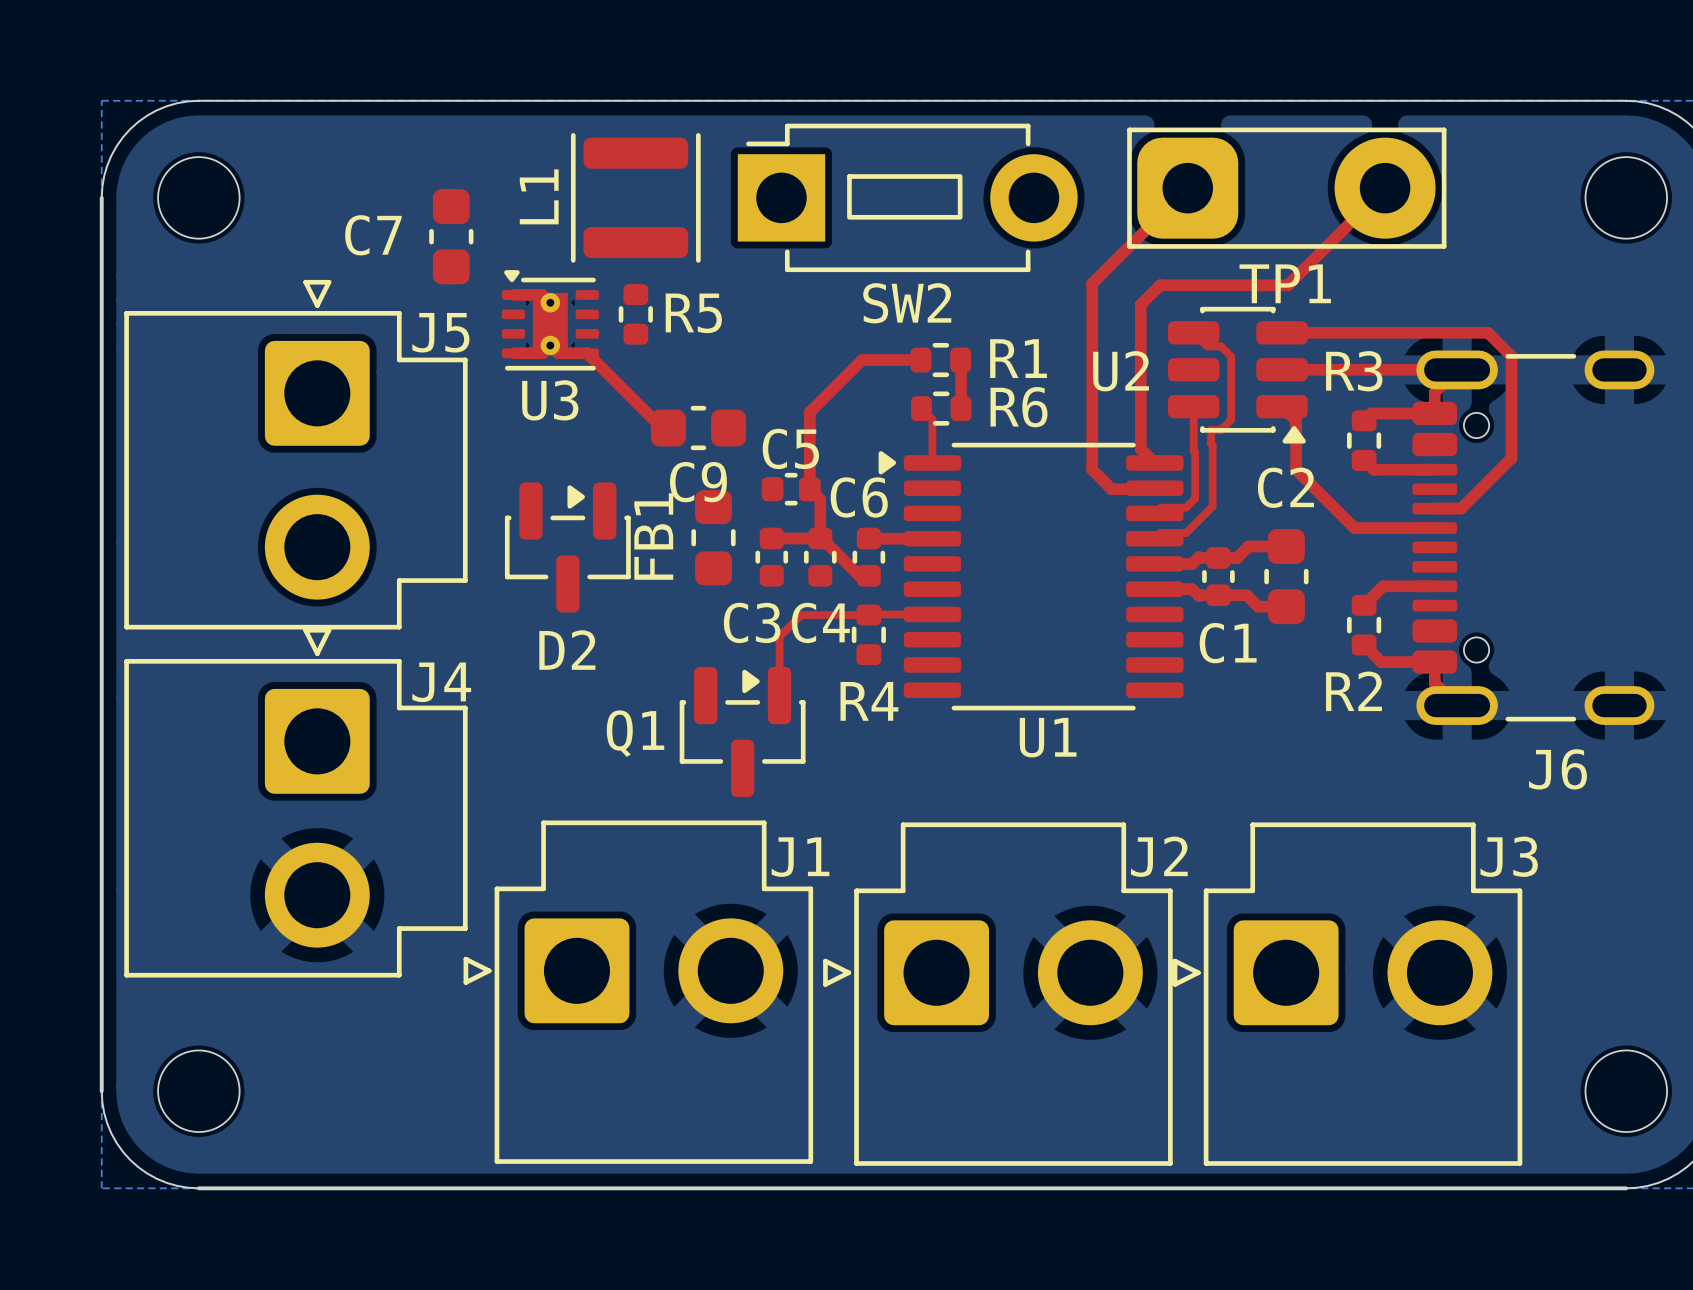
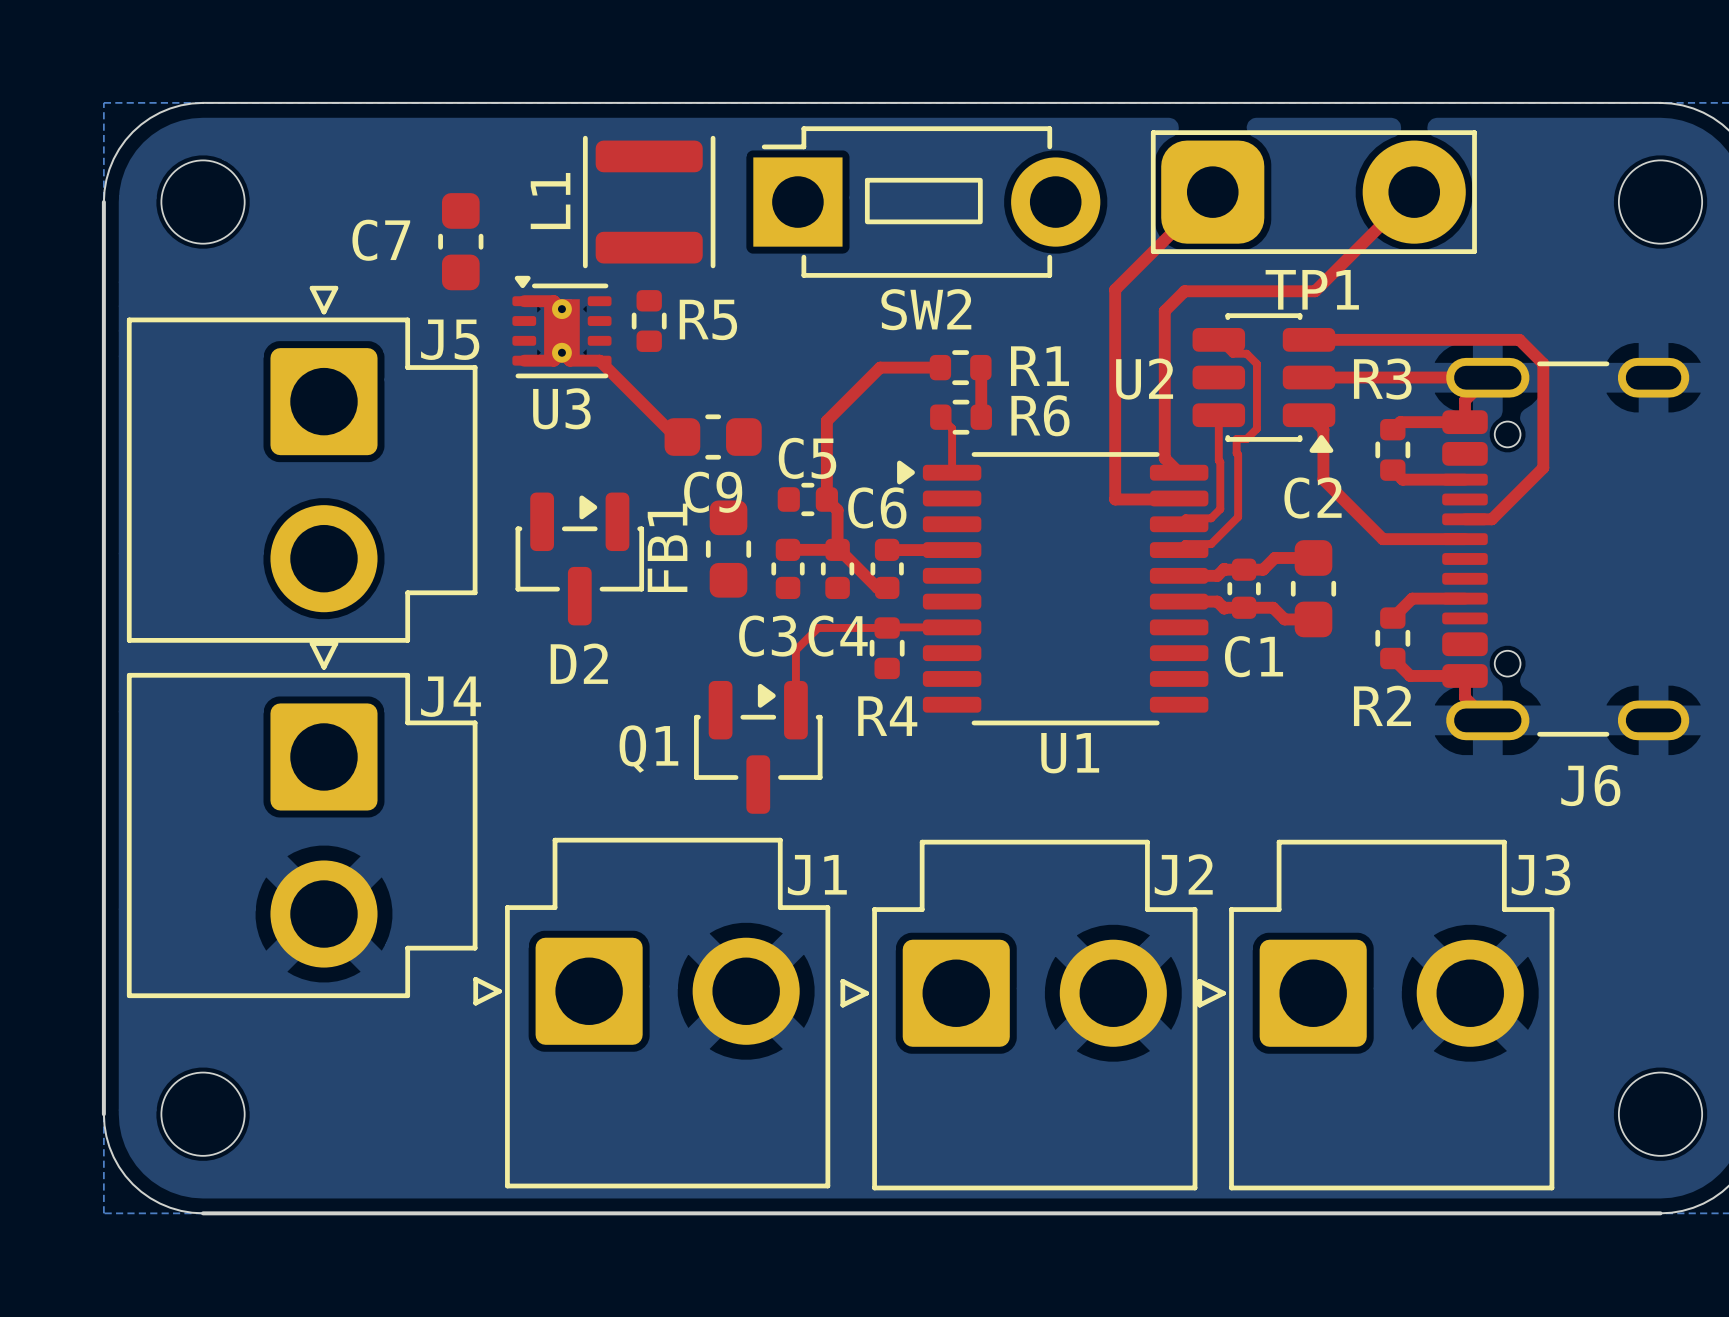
top track: (1092, 469) (1111, 489) -> (1115, 479) (1115, 499) (1135, 499)

